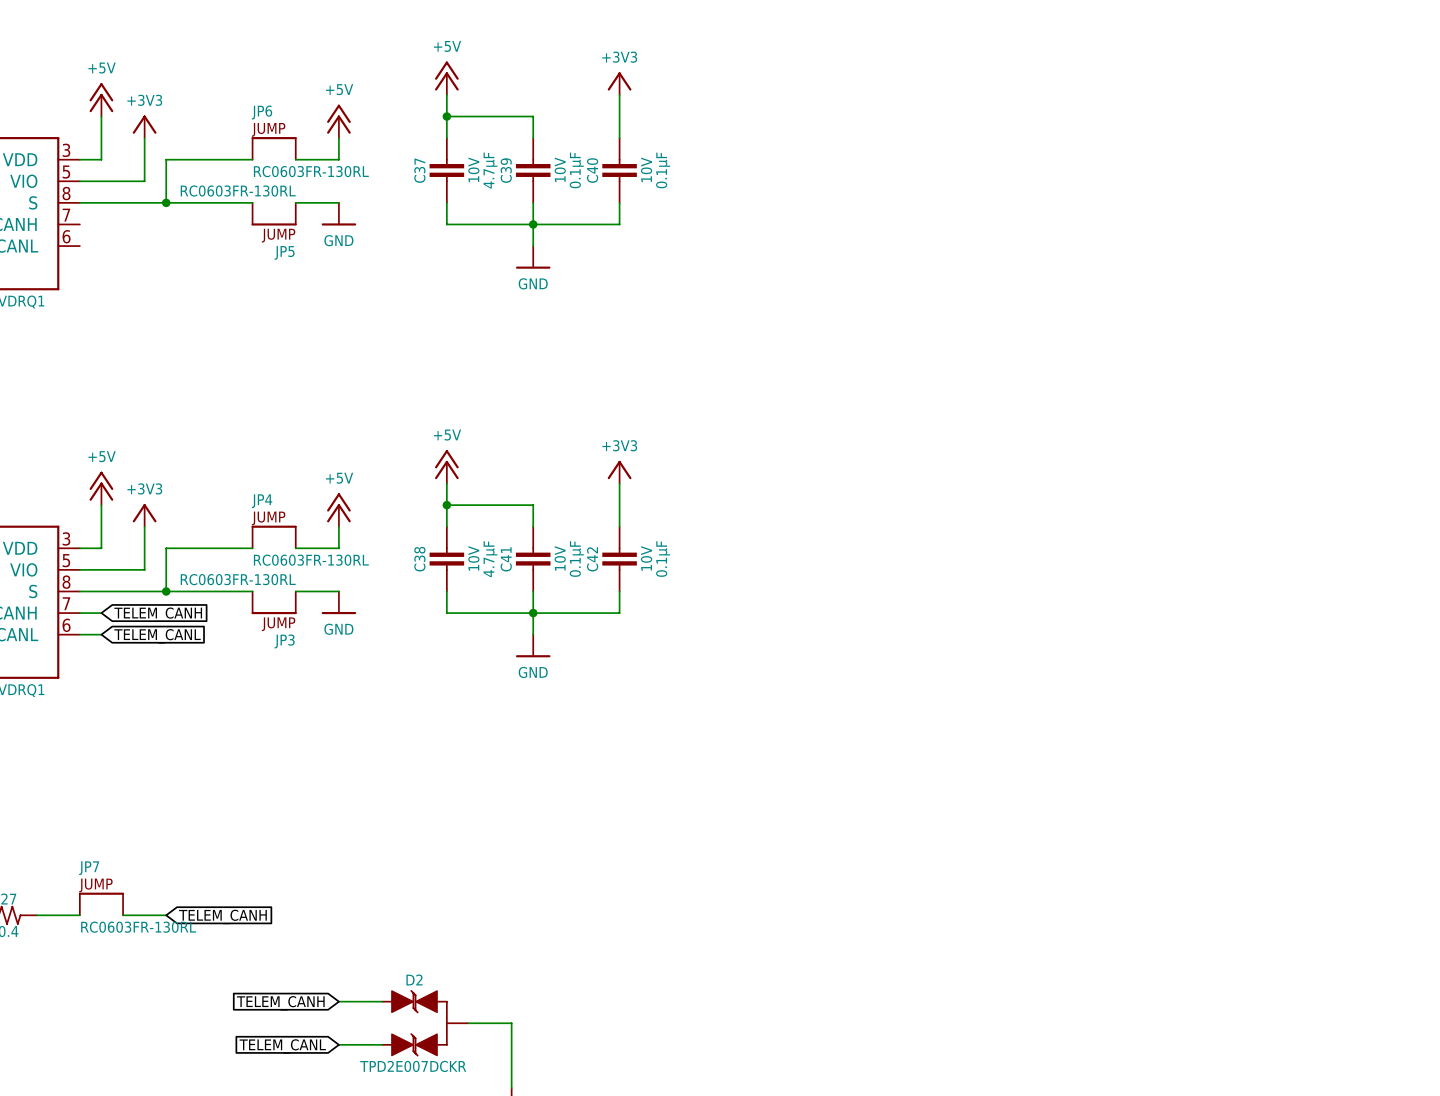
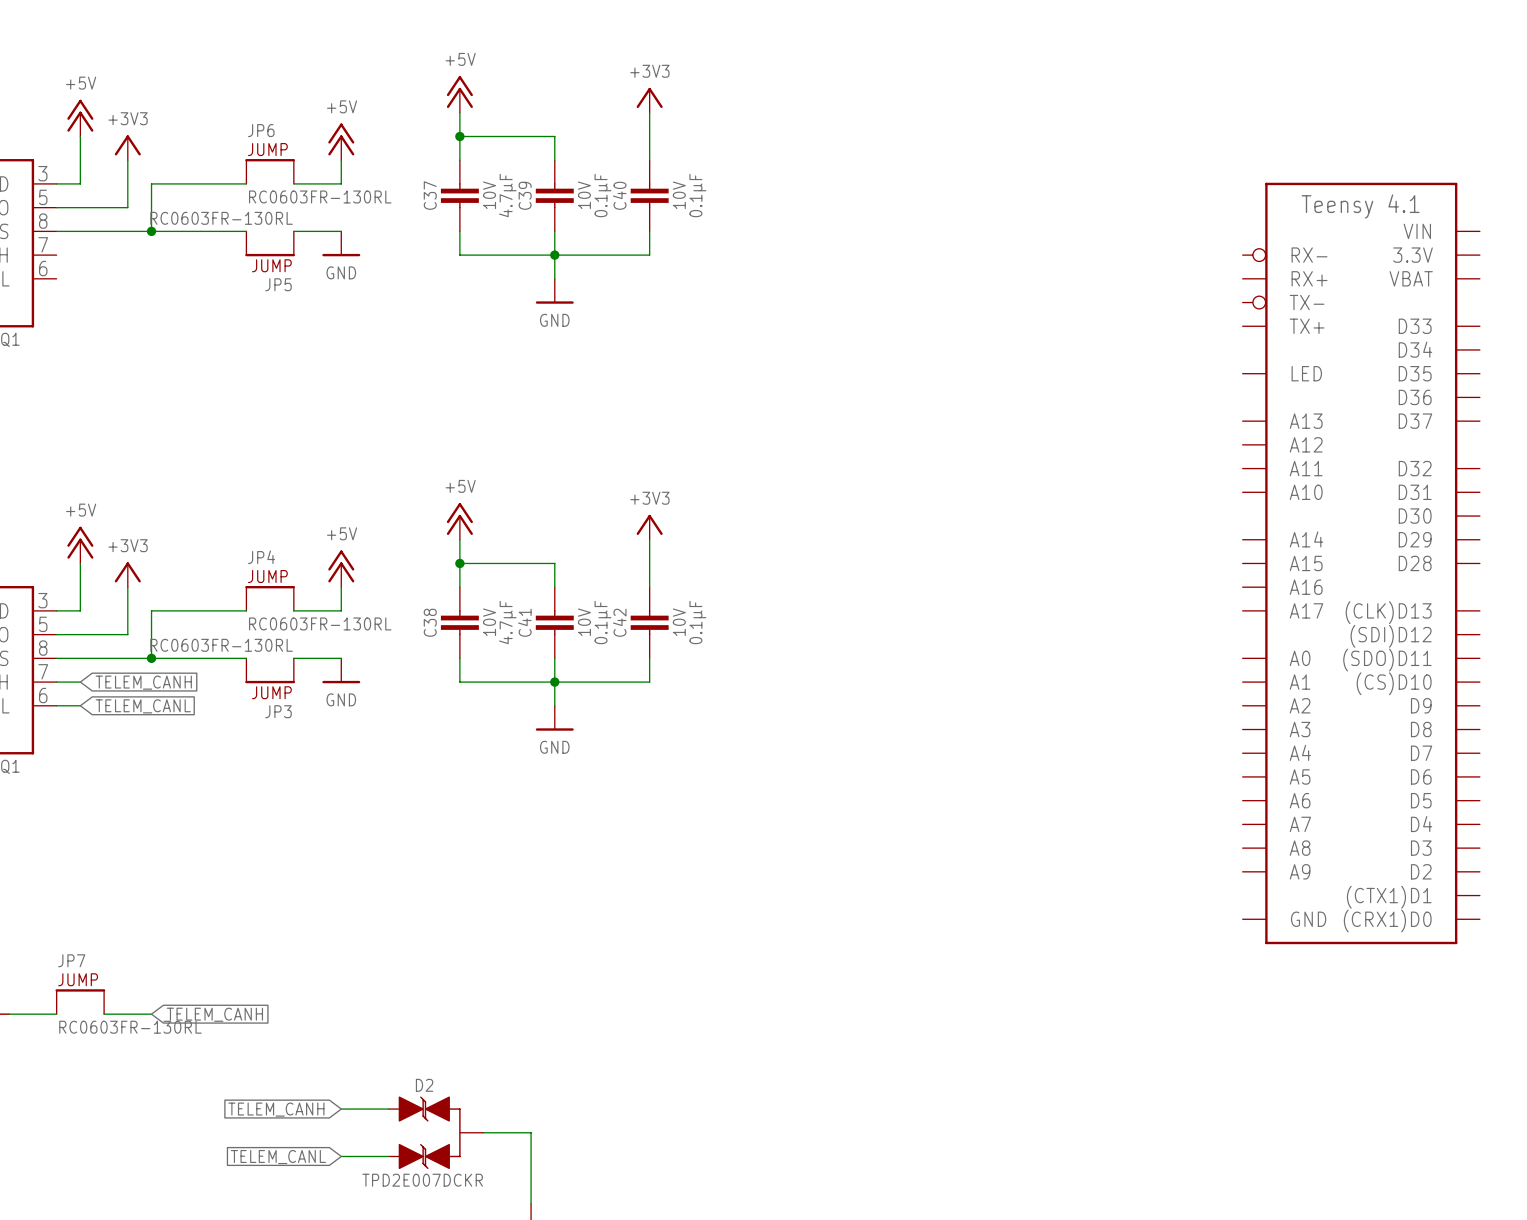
part: none -> (1361, 563)

